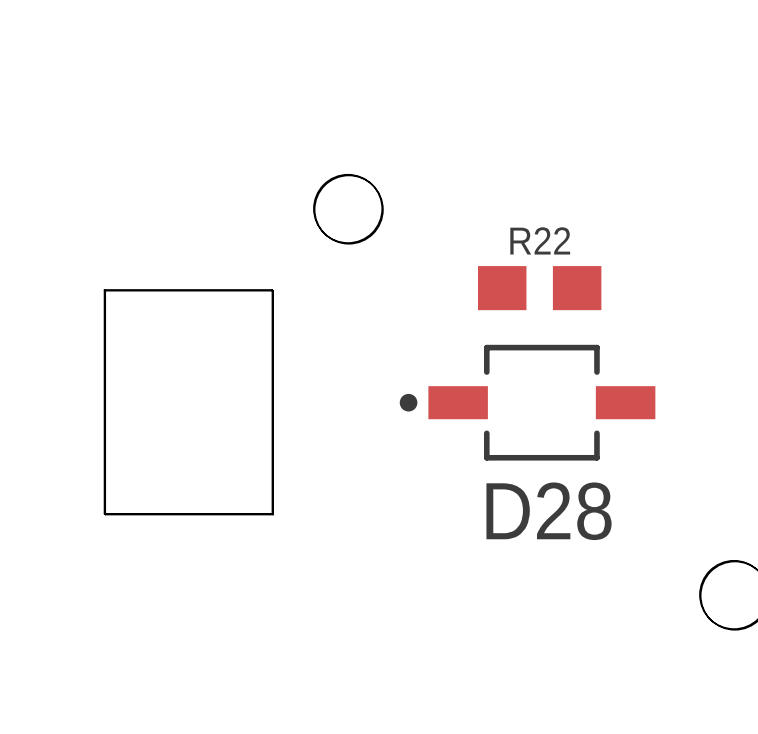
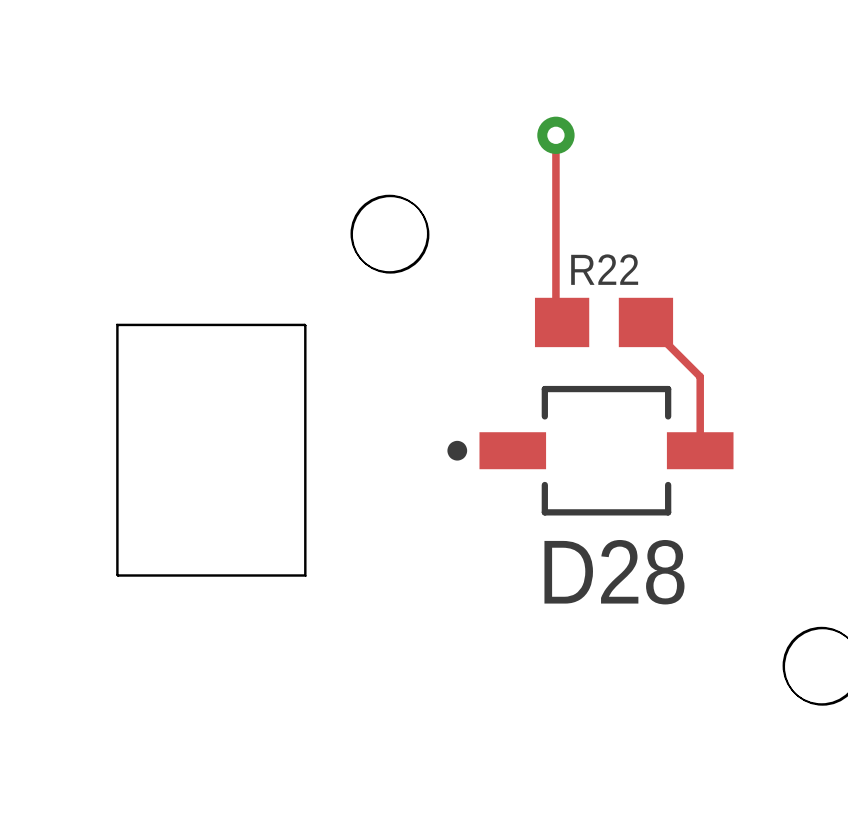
track: none -> (555, 135) (555, 316) (562, 322)
via: none -> (555, 135)
track: none -> (645, 322) (700, 376) (700, 450)

